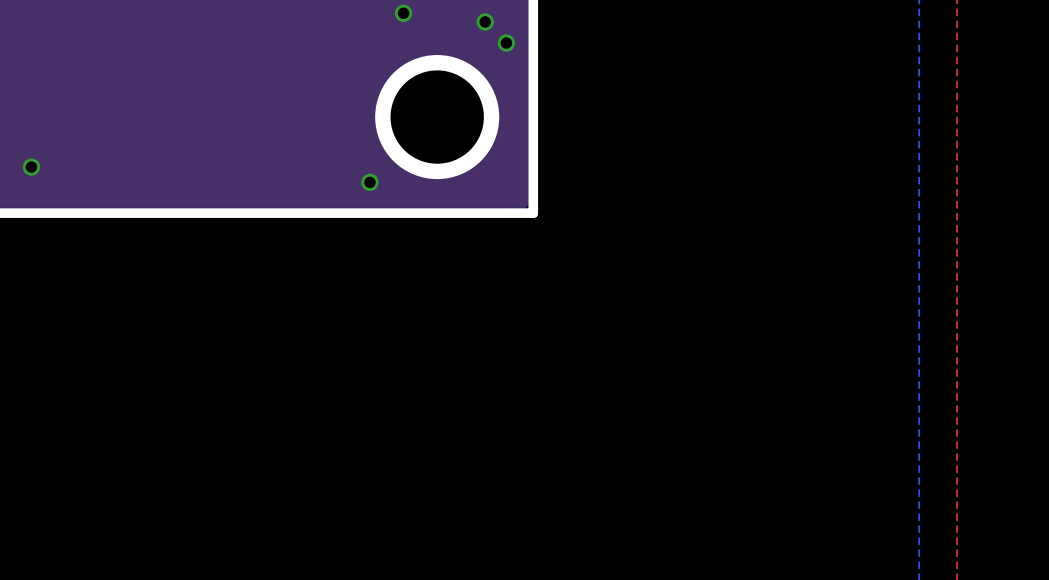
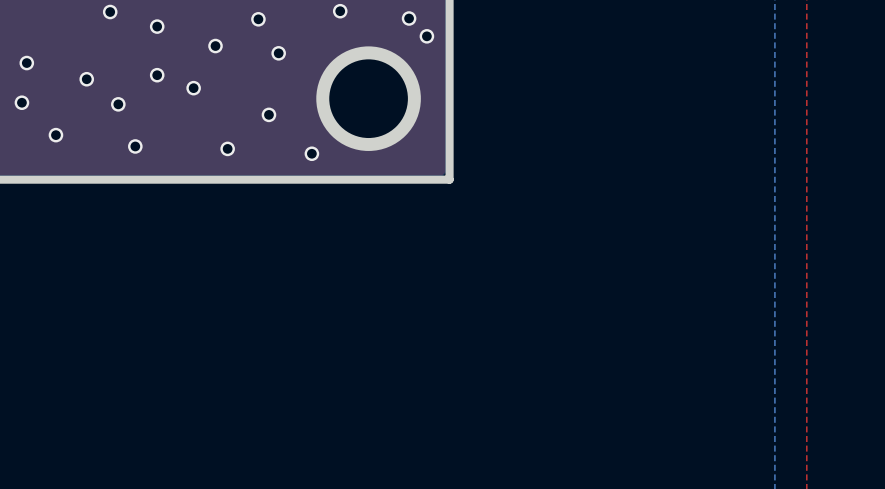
via: none -> (110, 12)
via: none -> (258, 19)
via: none -> (157, 26)
via: none -> (215, 46)
via: none -> (278, 53)
via: none -> (26, 63)
via: none -> (157, 75)
via: none -> (86, 79)
via: none -> (193, 88)
via: none -> (21, 102)
via: none -> (118, 104)
via: none -> (268, 114)
via: none -> (55, 135)
via: (31, 167) -> none
via: none -> (135, 146)
via: none -> (227, 148)

